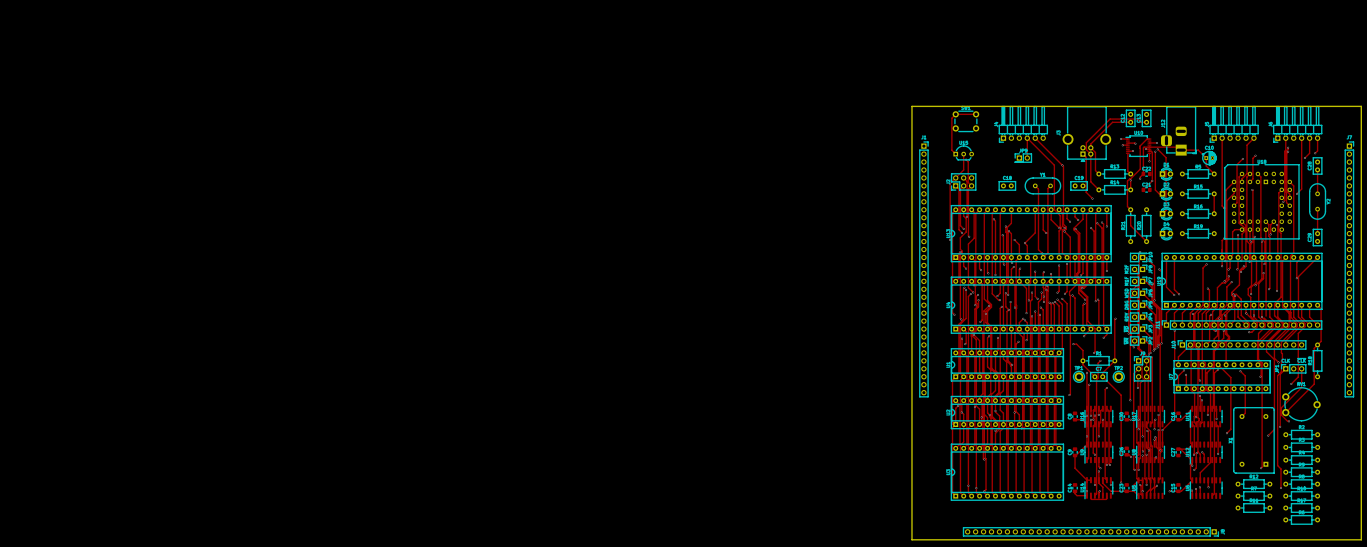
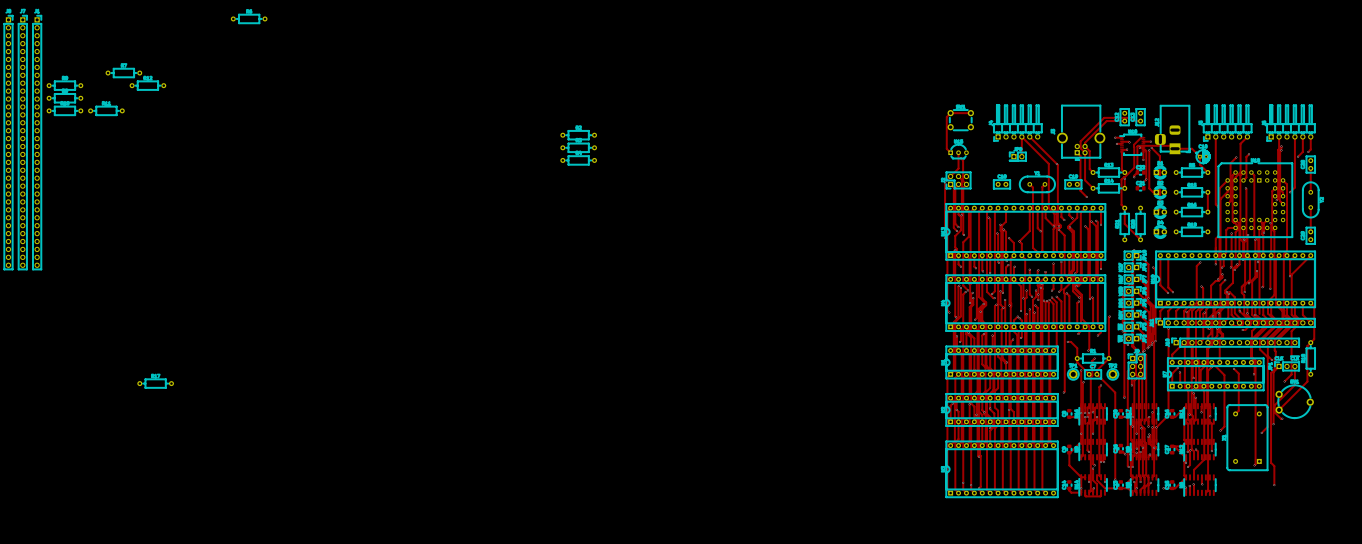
board edge: (911, 106) (911, 539) (1361, 539) (1361, 106) (911, 106) -> none
part position: (923, 269) -> (37, 142)
part position: (1349, 269) -> (22, 142)
part position: (1301, 434) -> (578, 135)
part position: (1301, 447) -> (578, 147)
part position: (1301, 460) -> (578, 160)
part position: (1301, 472) -> (64, 85)
part position: (1253, 484) -> (147, 85)
part position: (1301, 484) -> (64, 98)
part position: (1253, 496) -> (123, 73)
part position: (1301, 496) -> (64, 110)
part position: (1253, 507) -> (106, 110)
part position: (1301, 507) -> (155, 383)
part position: (1301, 519) -> (249, 18)
part rotation: 0° (1090, 531) -> 90° counterclockwise (8, 142)
part position: (1090, 531) -> (8, 142)

